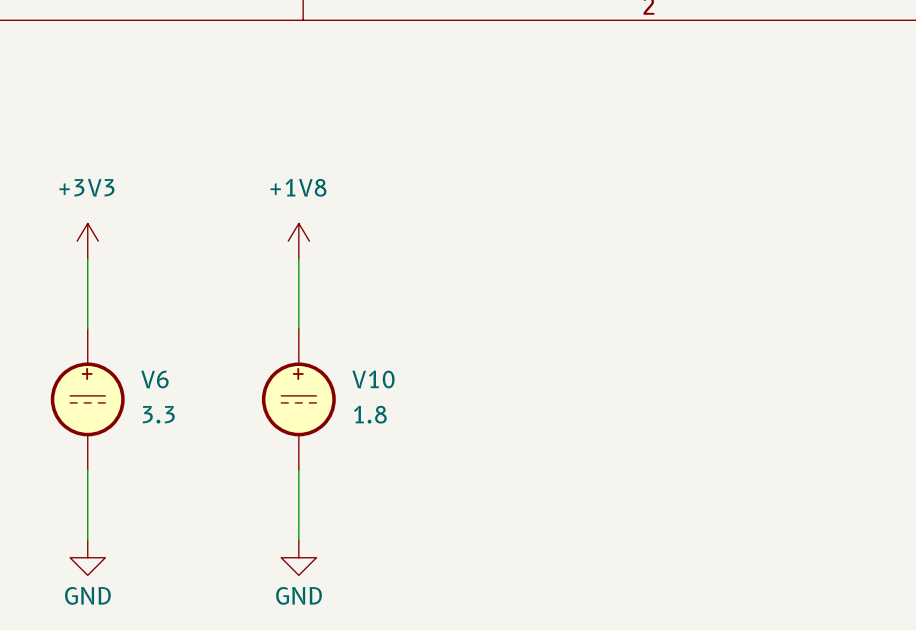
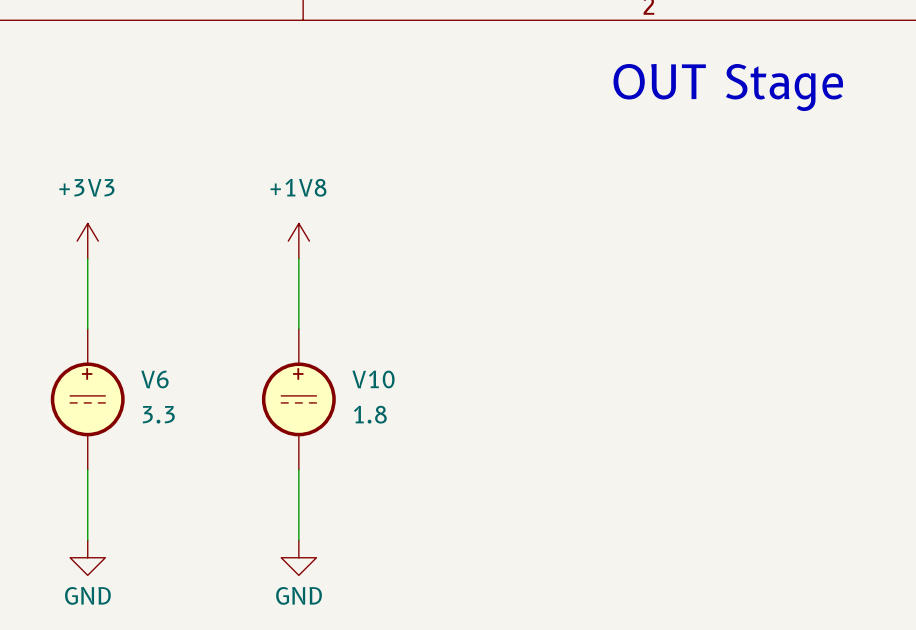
text: none -> OUT Stage (728, 87)

